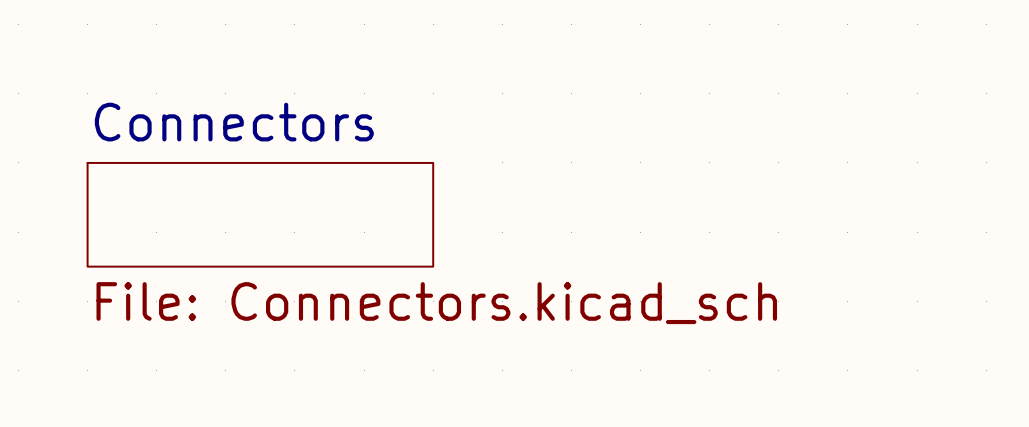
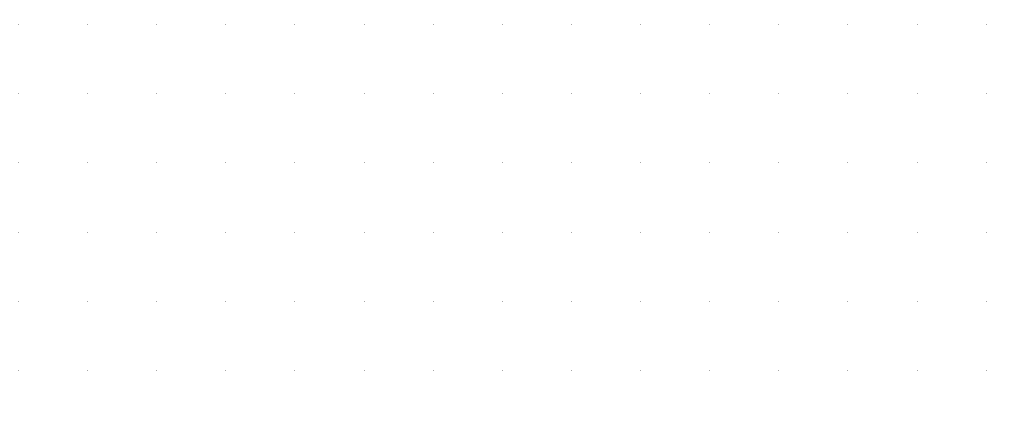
sheet Connectors: File: Connectors.kicad_sch (260, 214) -> none

